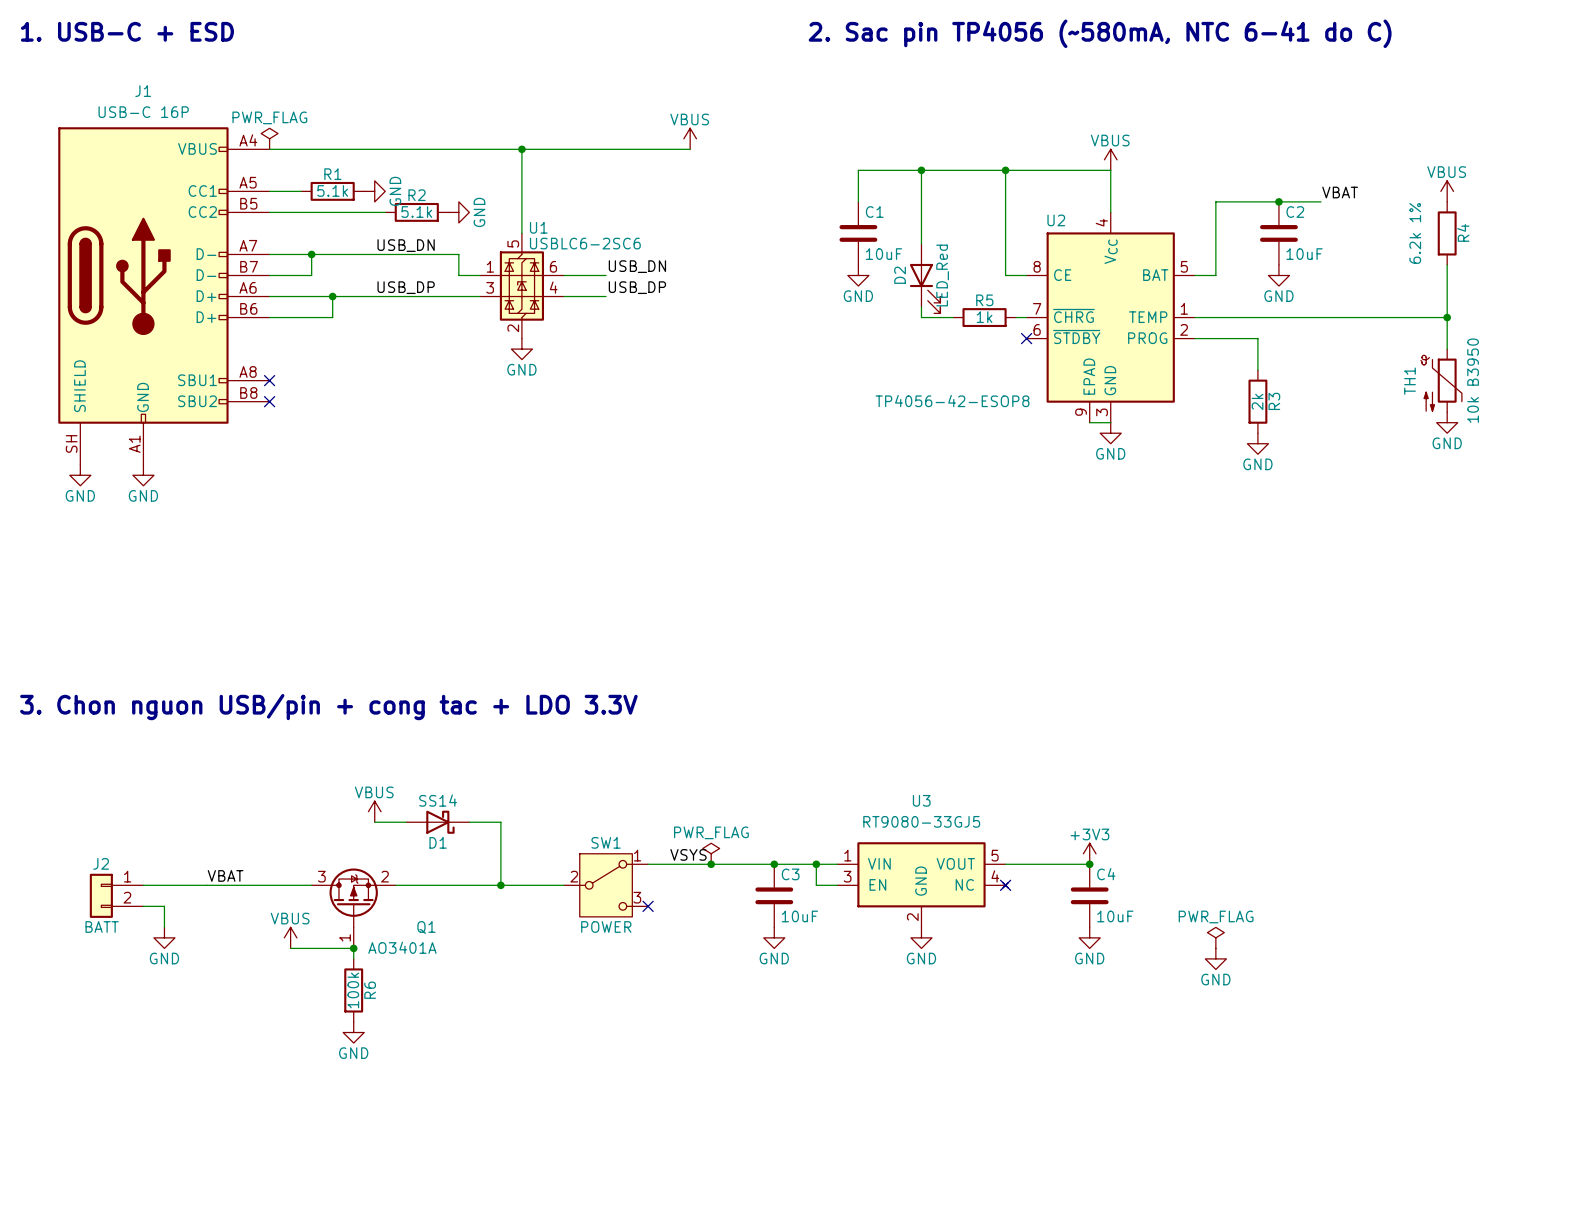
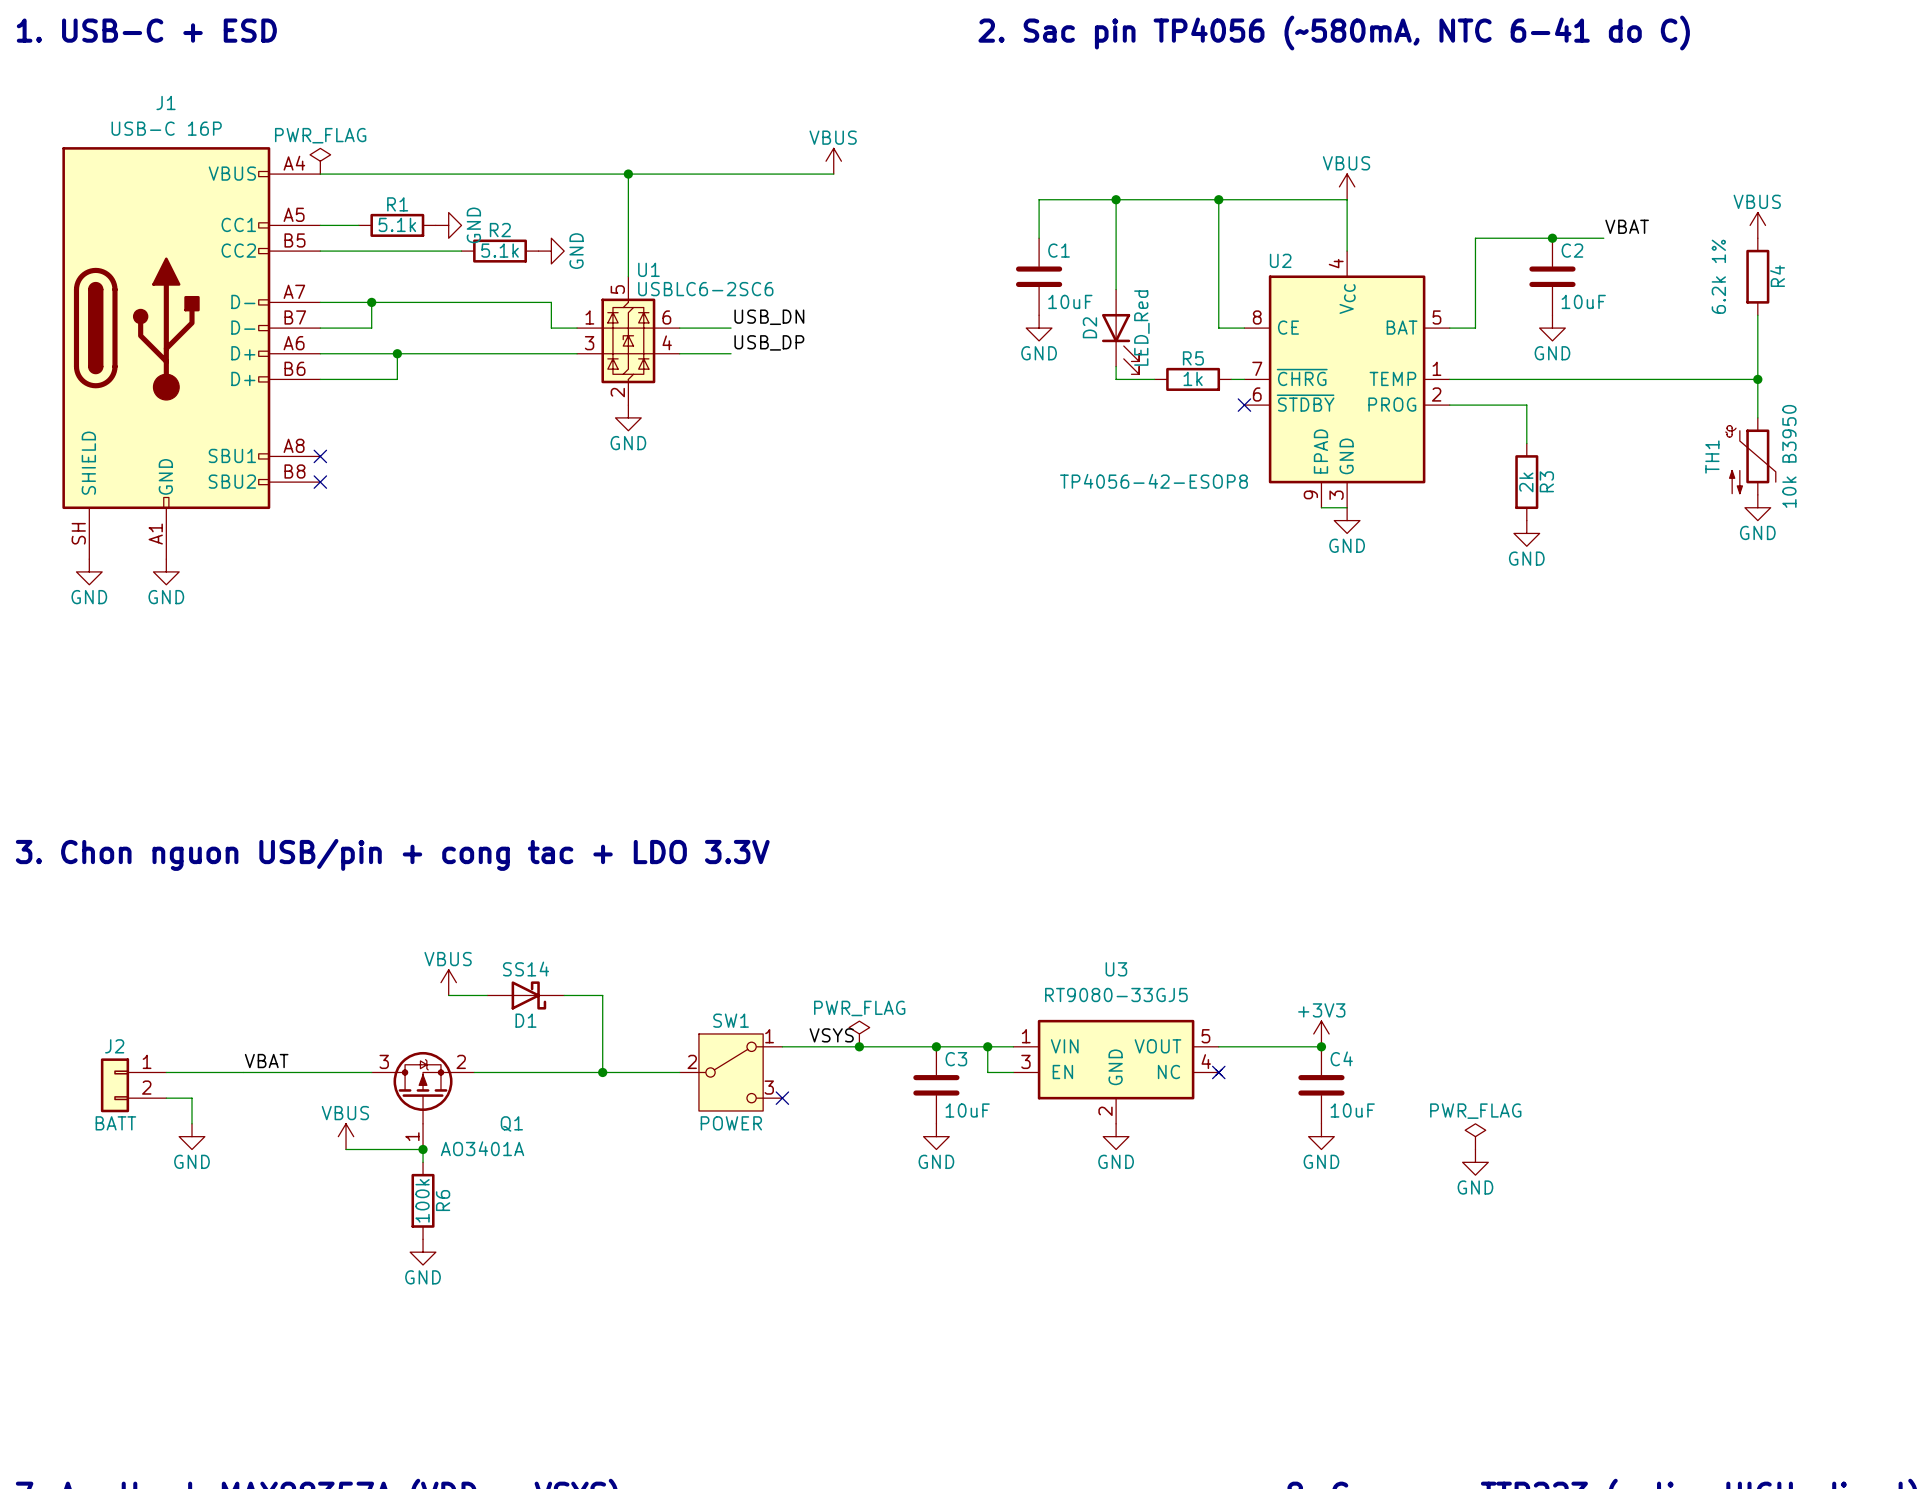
label: USB_DN (406, 245) -> none
label: USB_DP (406, 287) -> none

